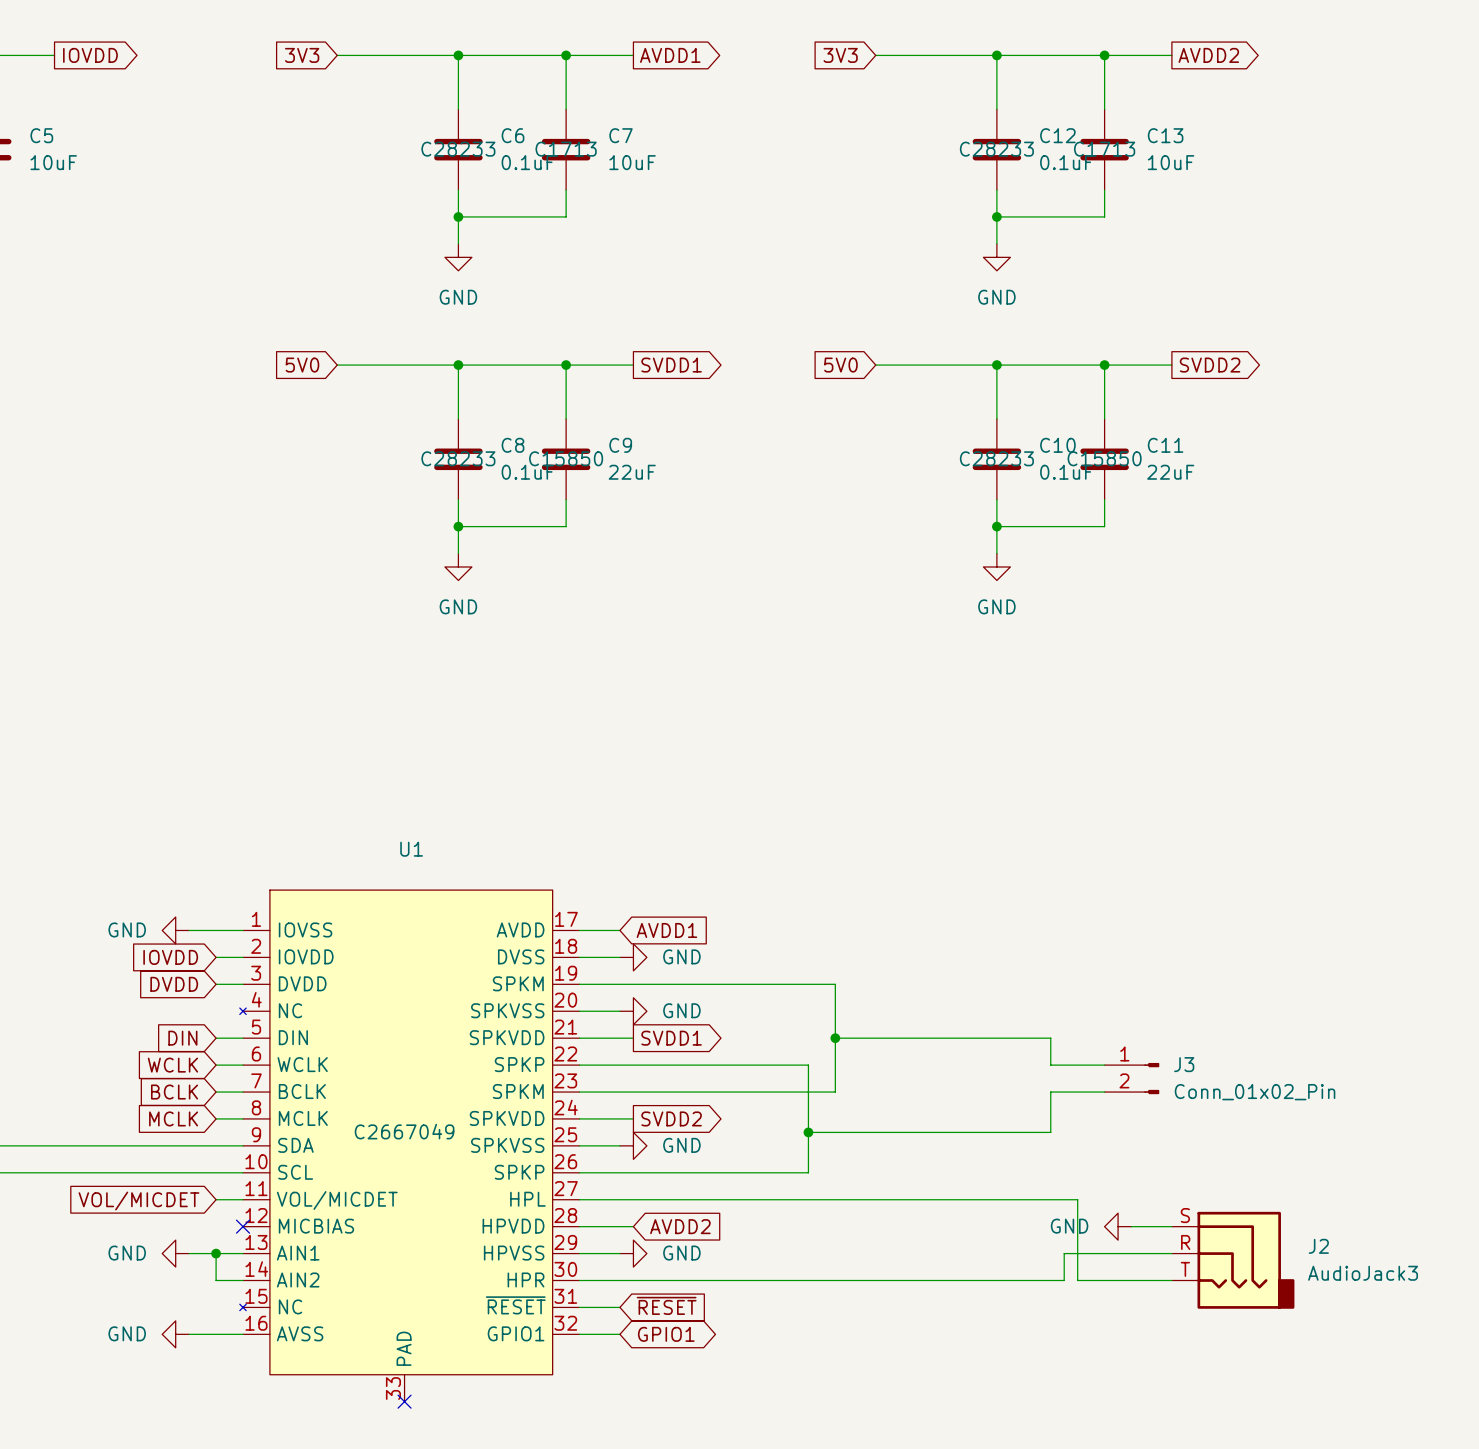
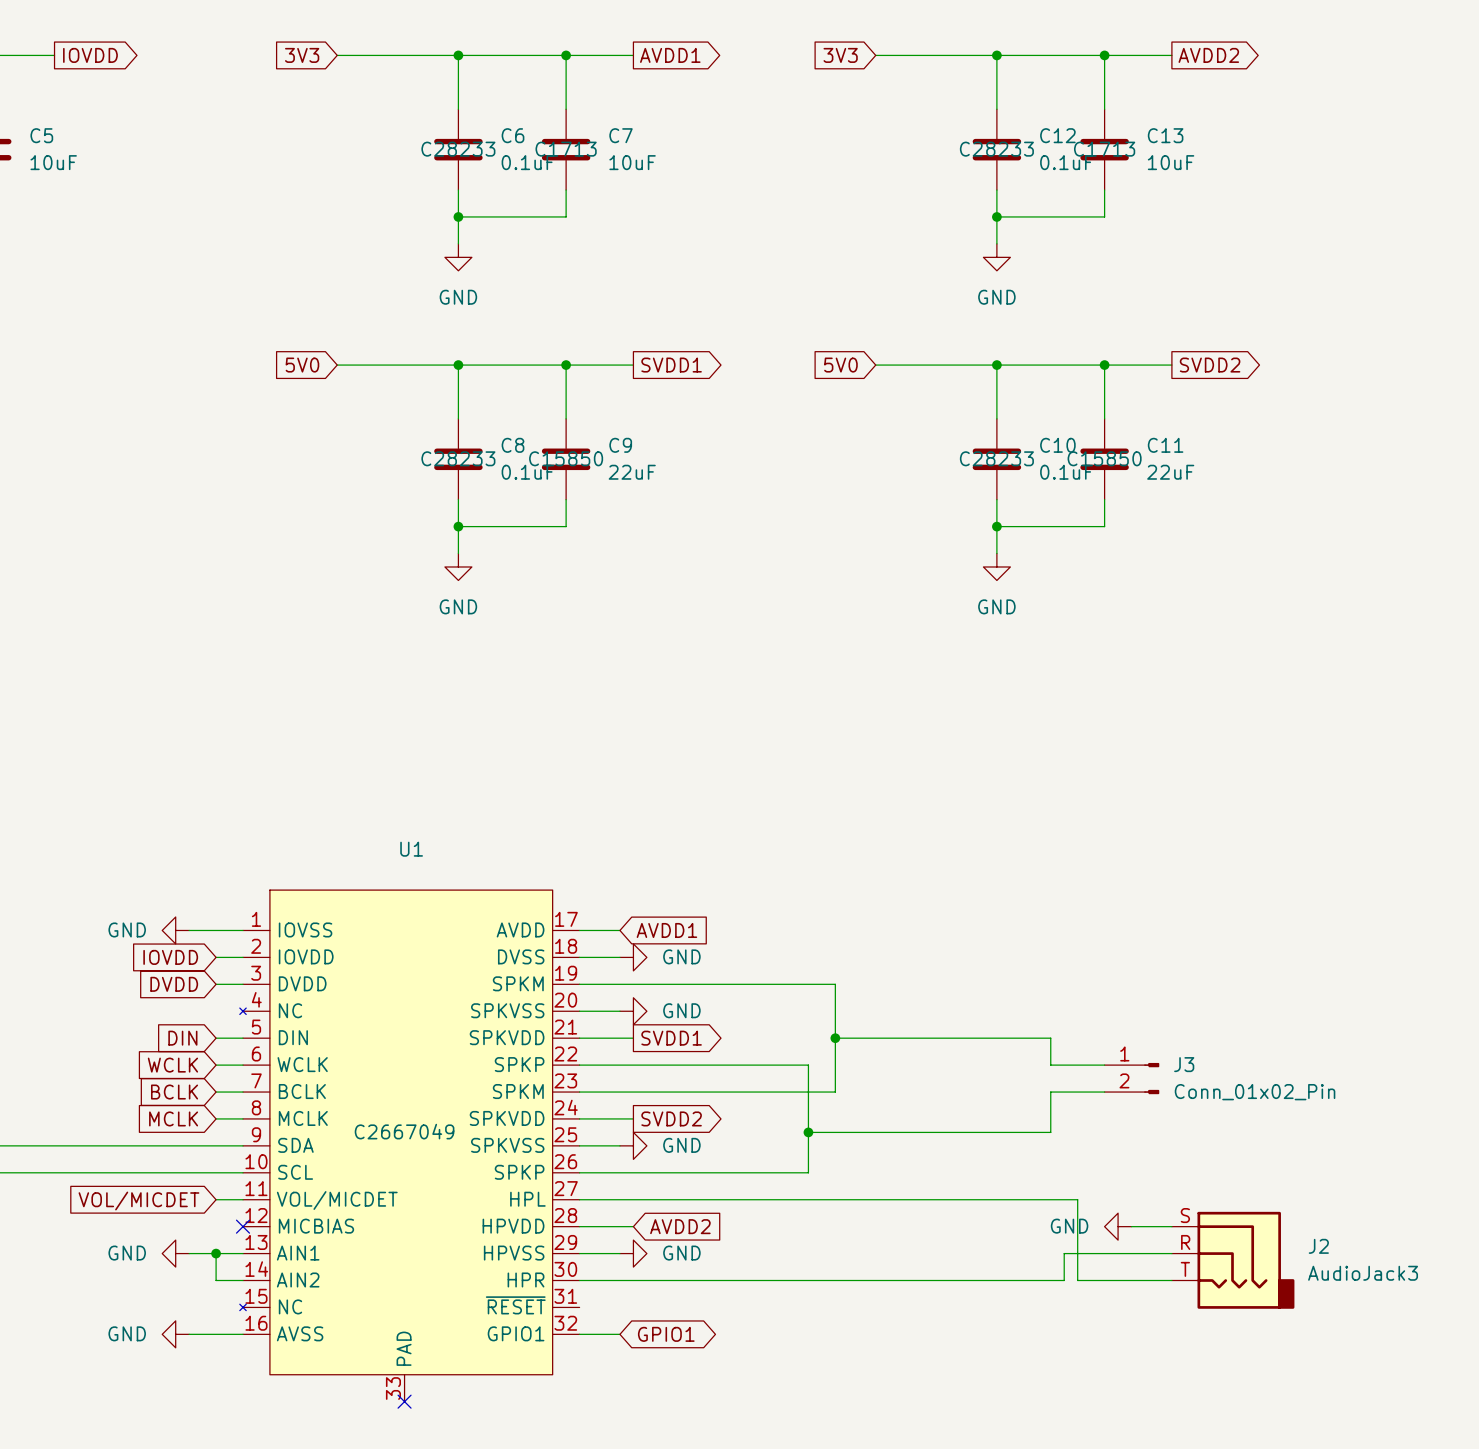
global label: ~{RESET} (666, 1305) -> none
wire: (579, 1307) (619, 1307) -> none

